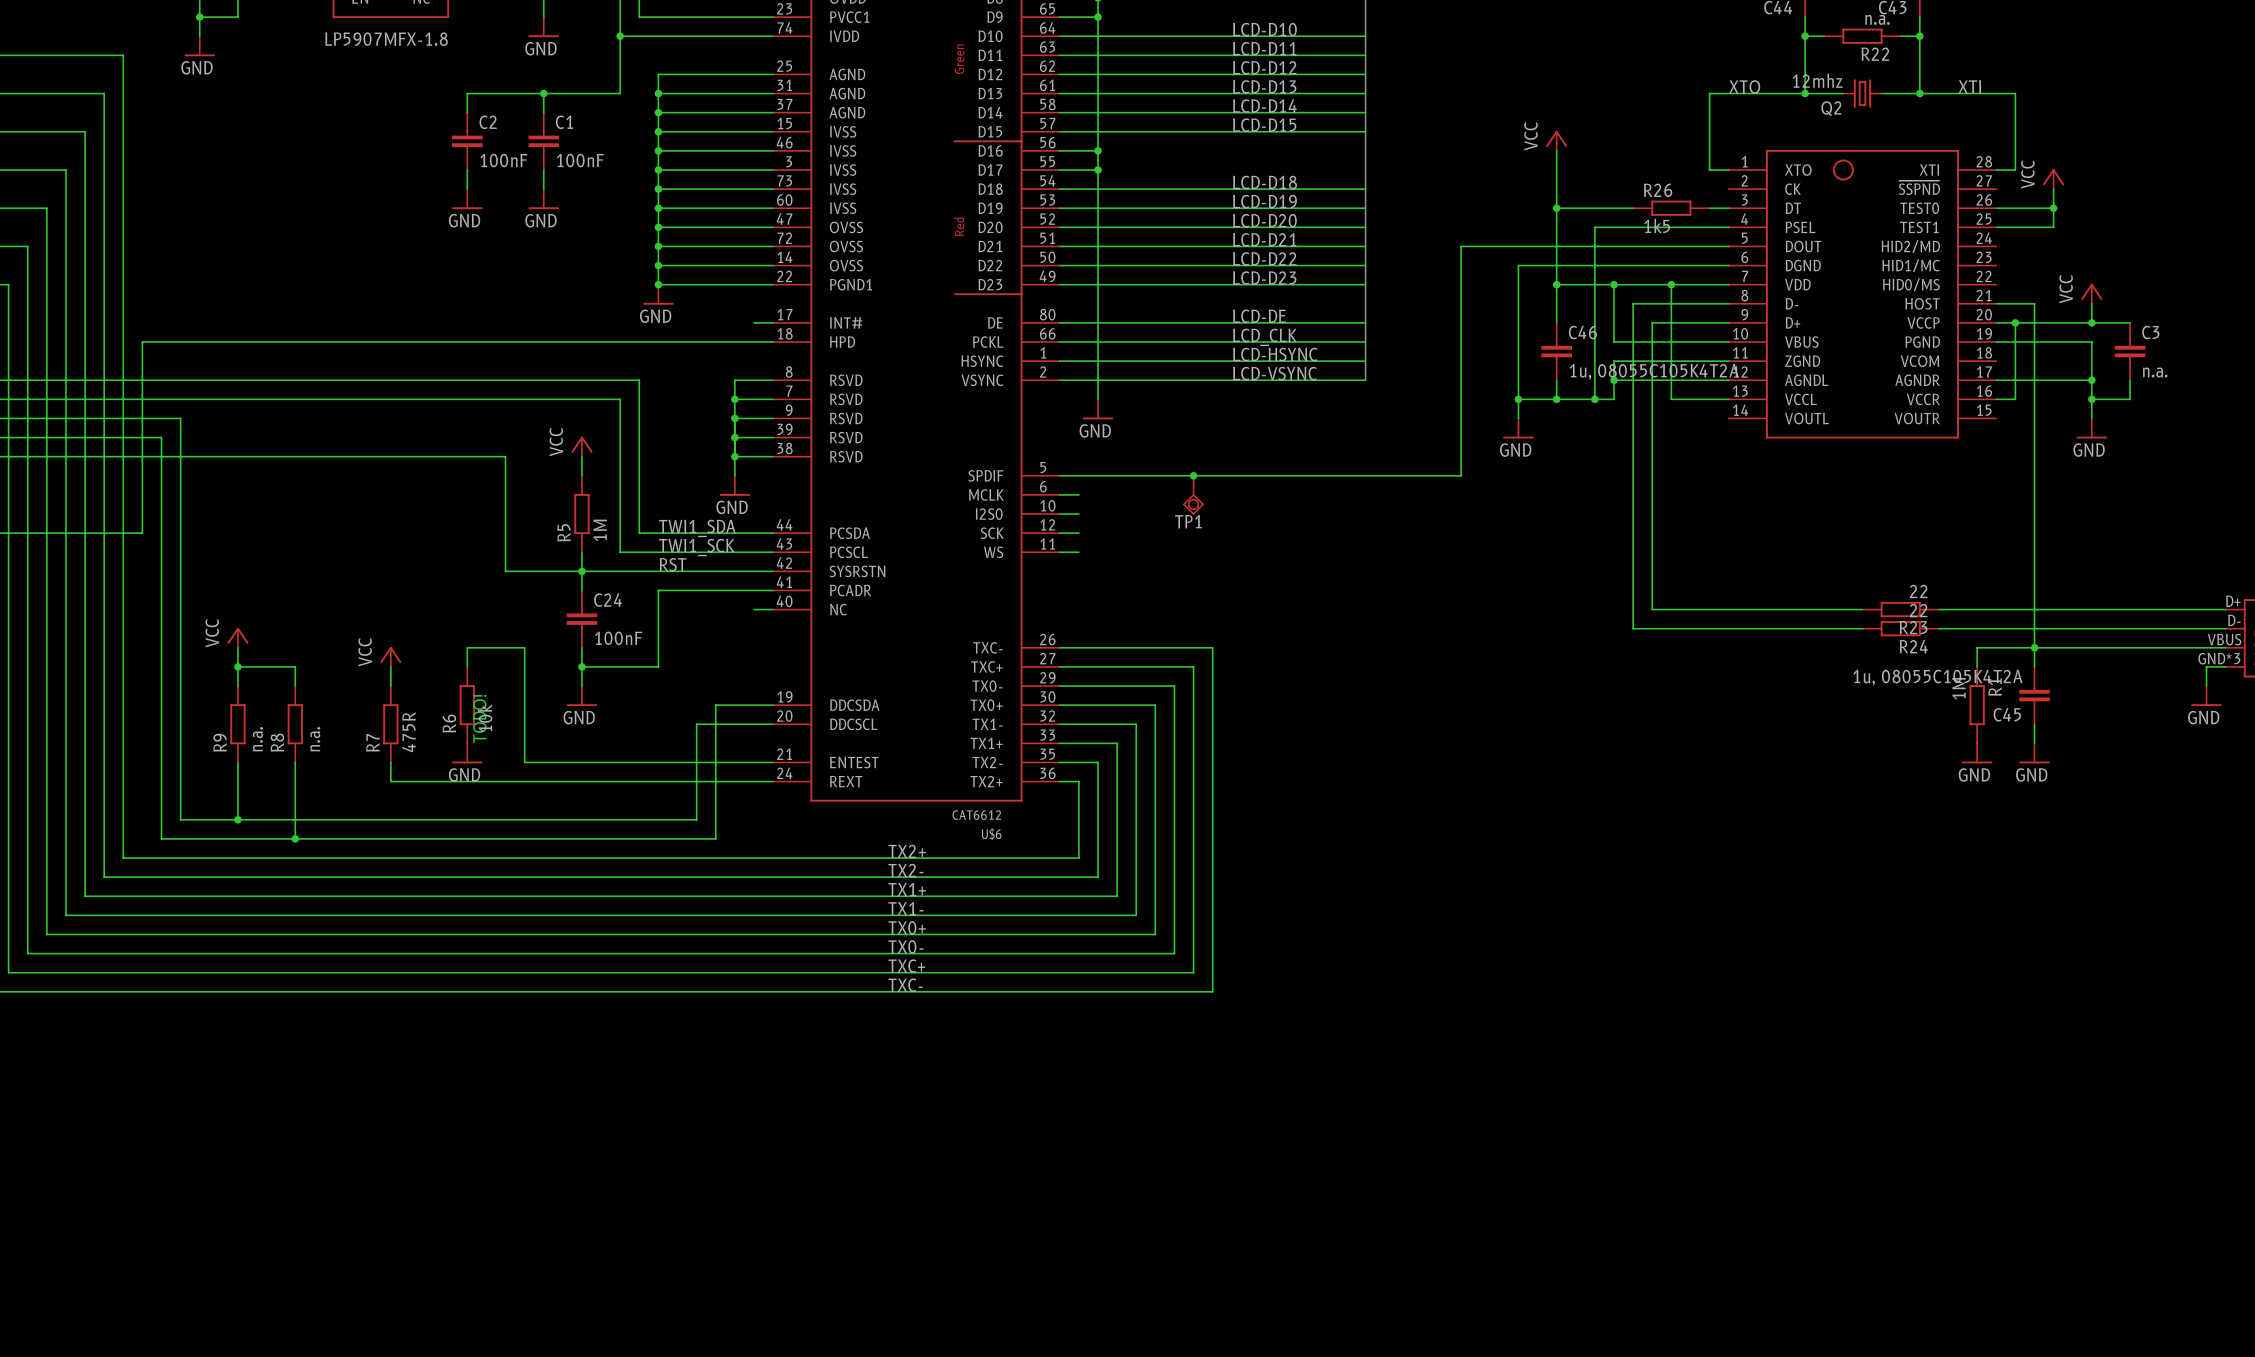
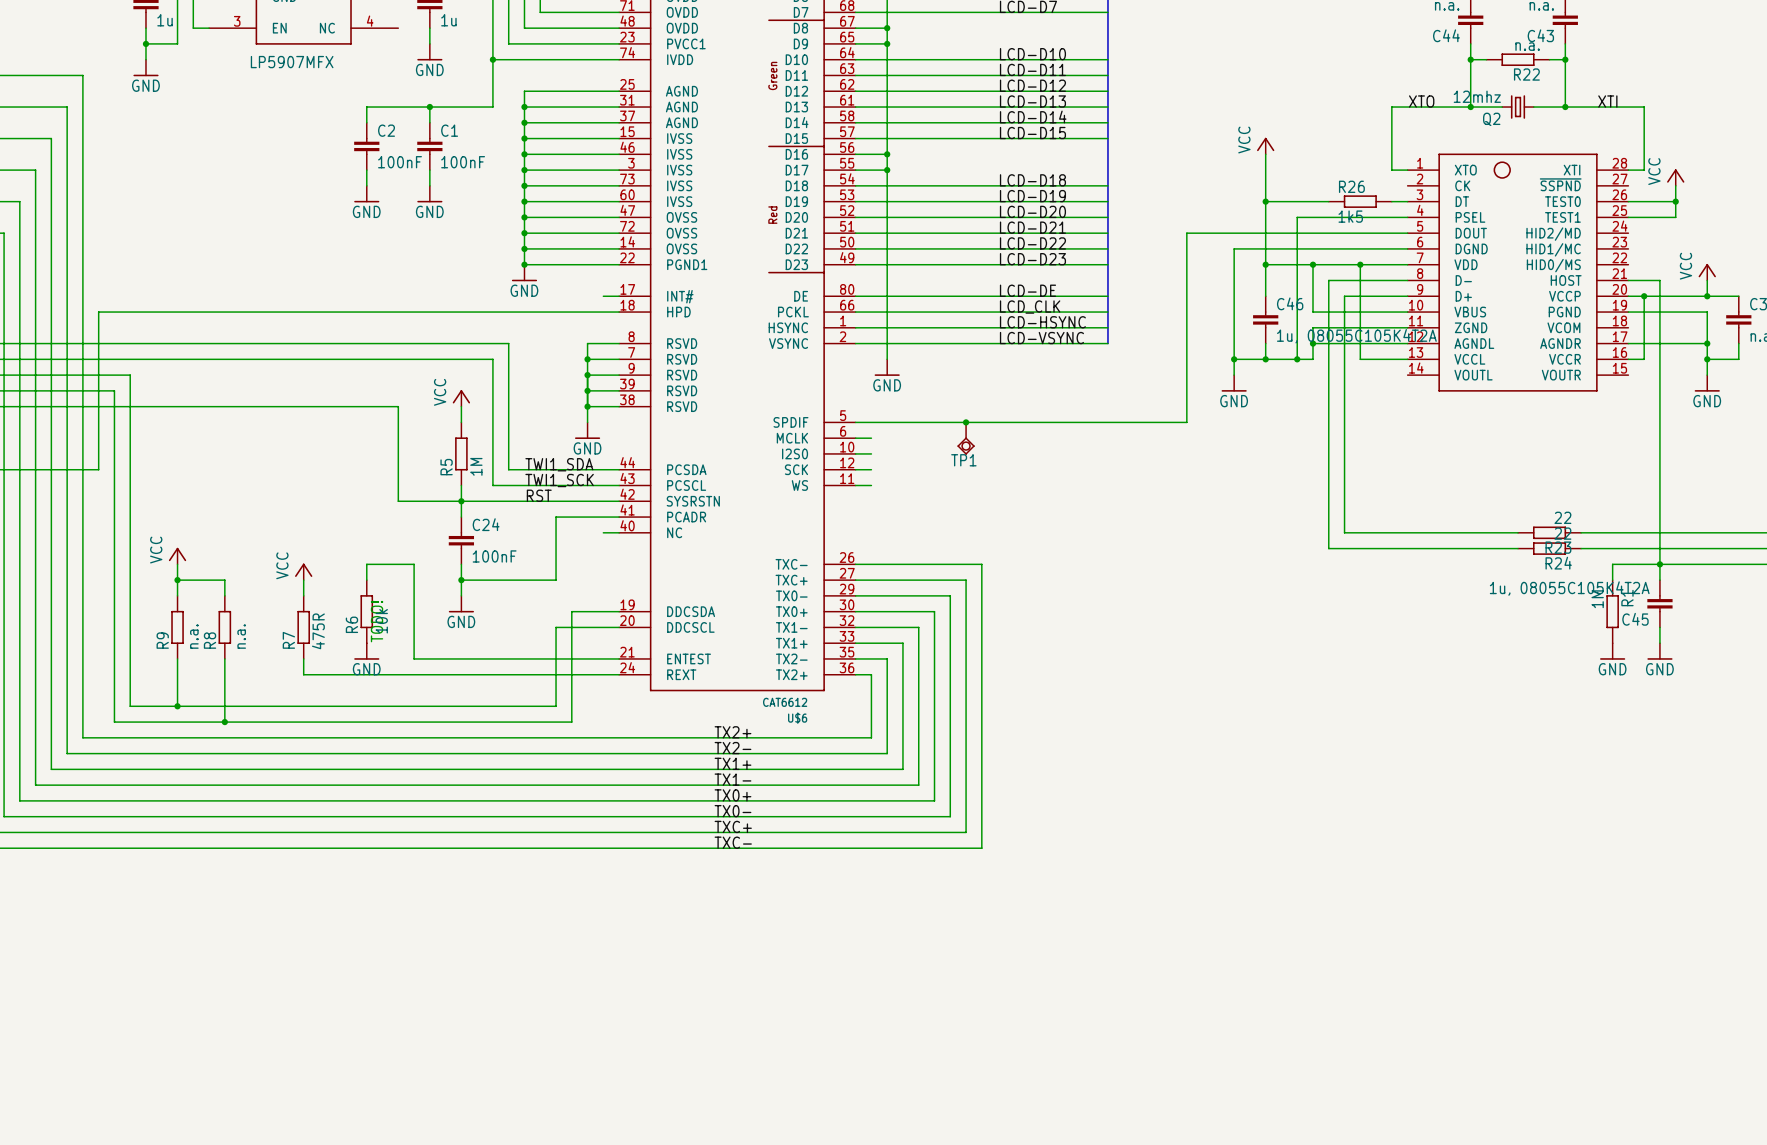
part value: LP5907MFX-1.8 (386, 39) -> LP5907MFX (292, 62)
wire: (696, 590) (658, 590) (658, 666) -> (556, 517) (556, 580) (524, 580)

